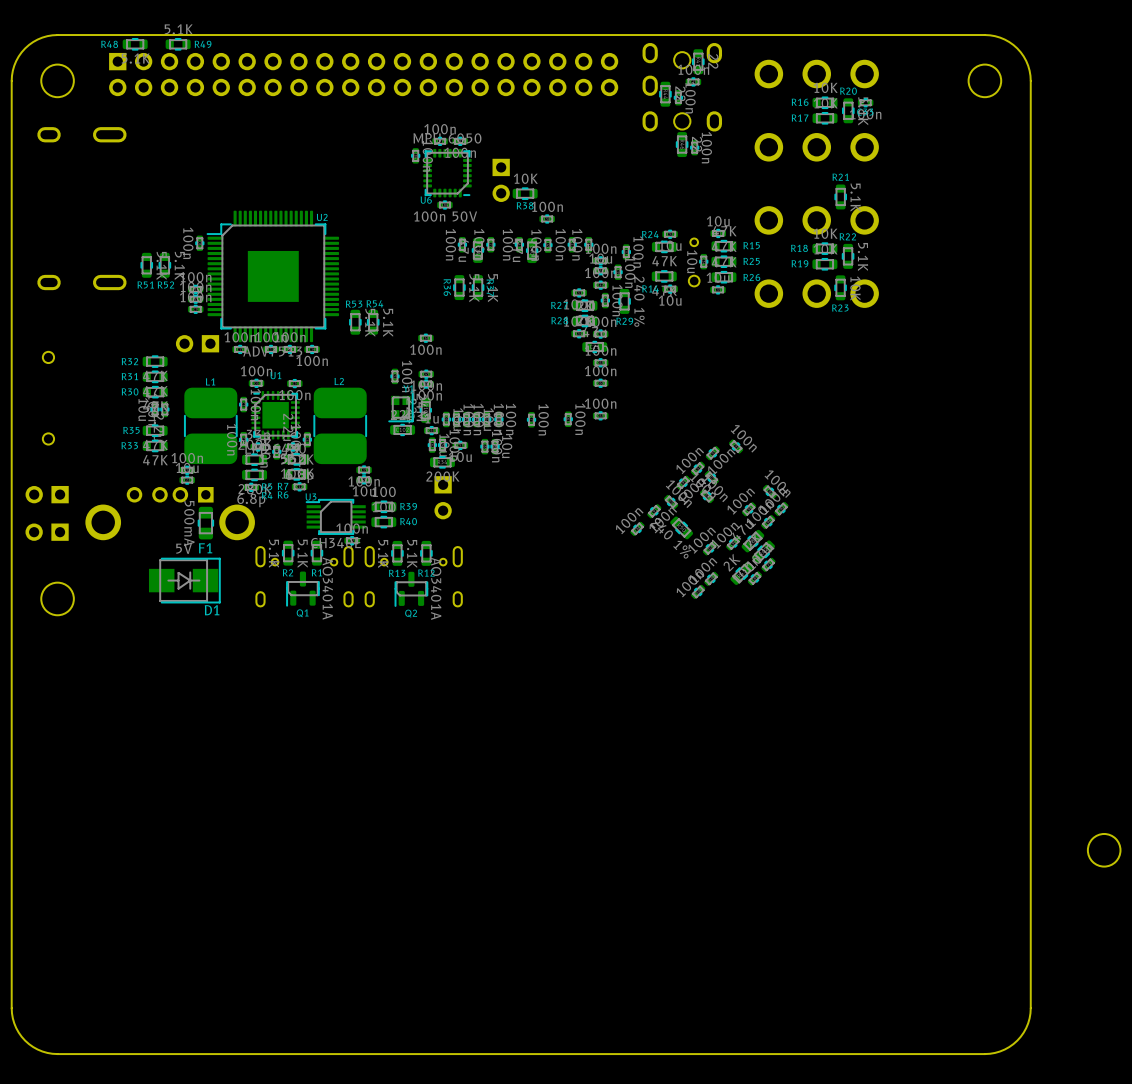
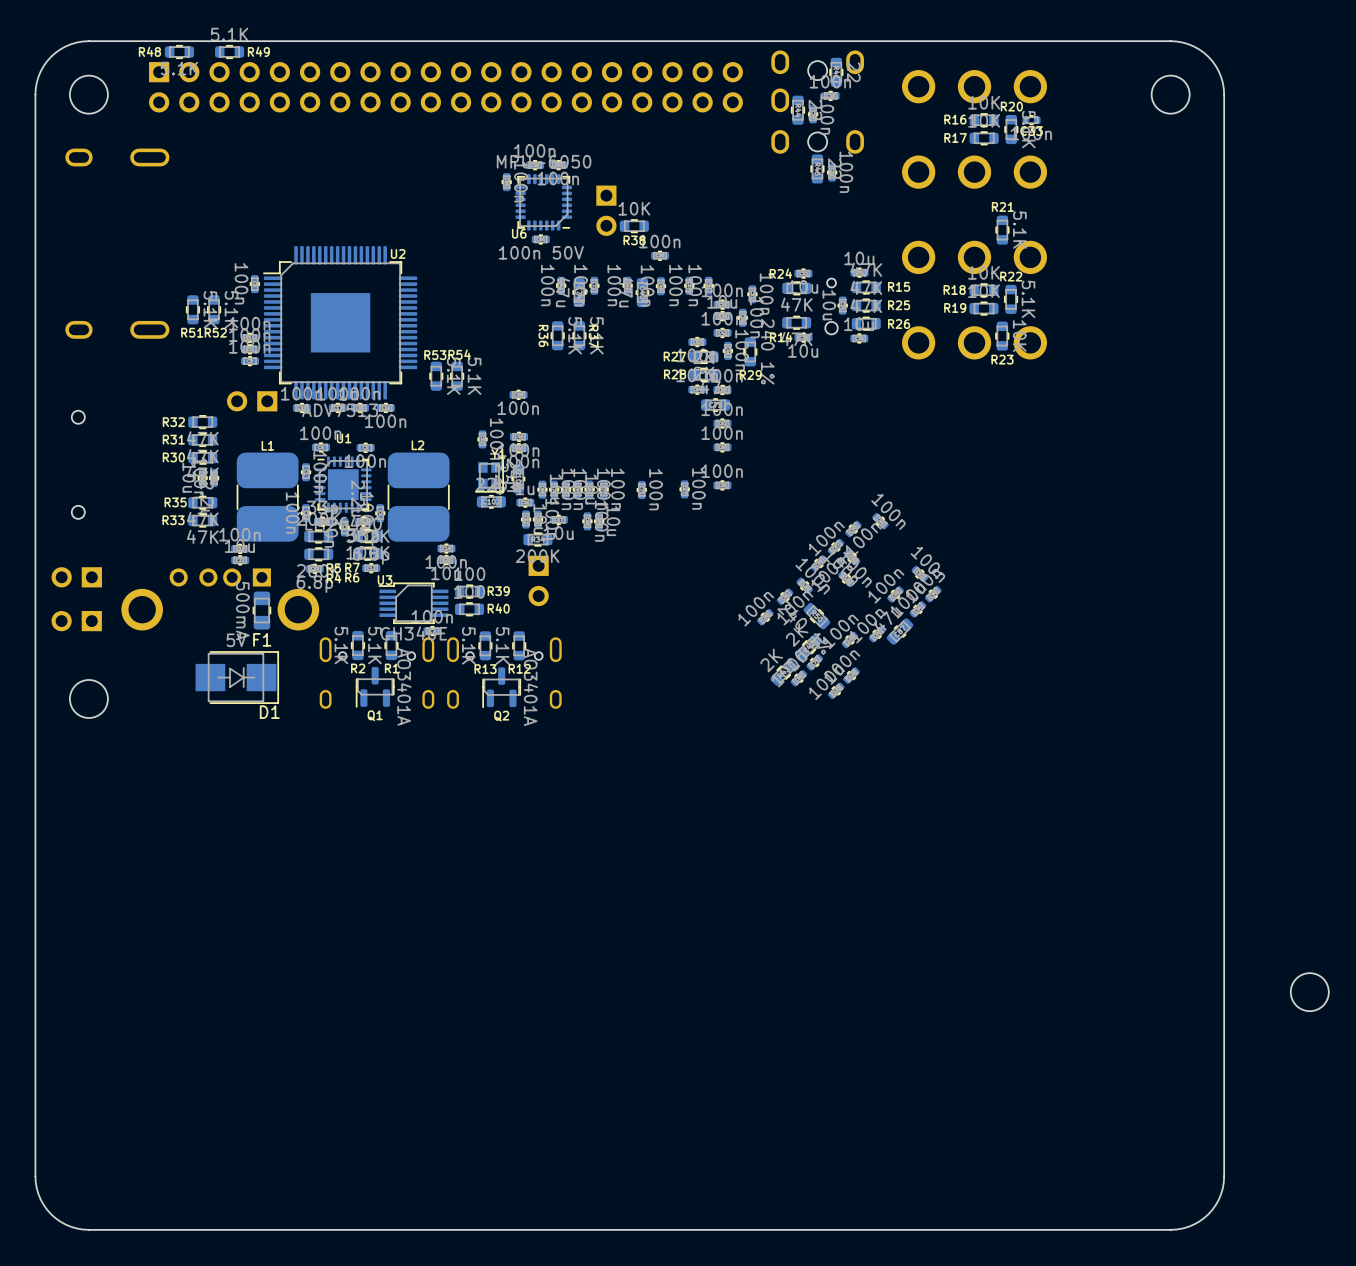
part position: (763, 551) -> (809, 647)
part position: (768, 564) -> (814, 662)
part position: (741, 573) -> (783, 672)
part position: (754, 578) -> (798, 678)

